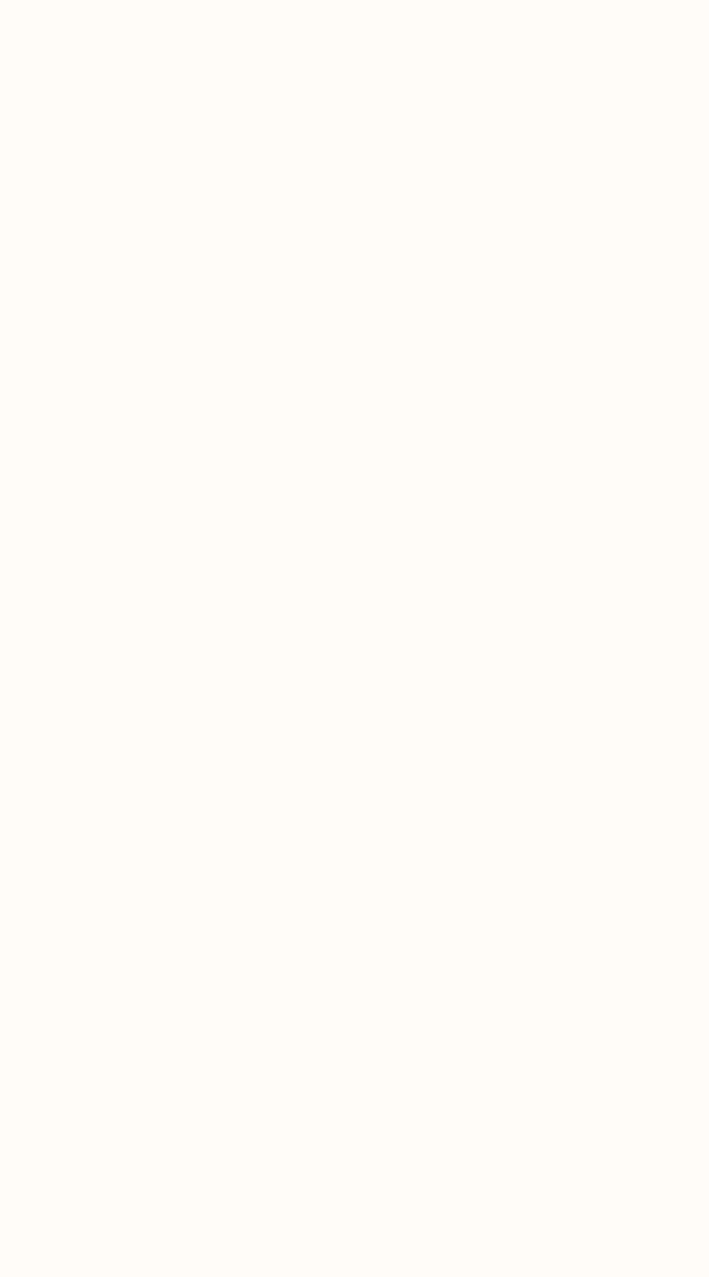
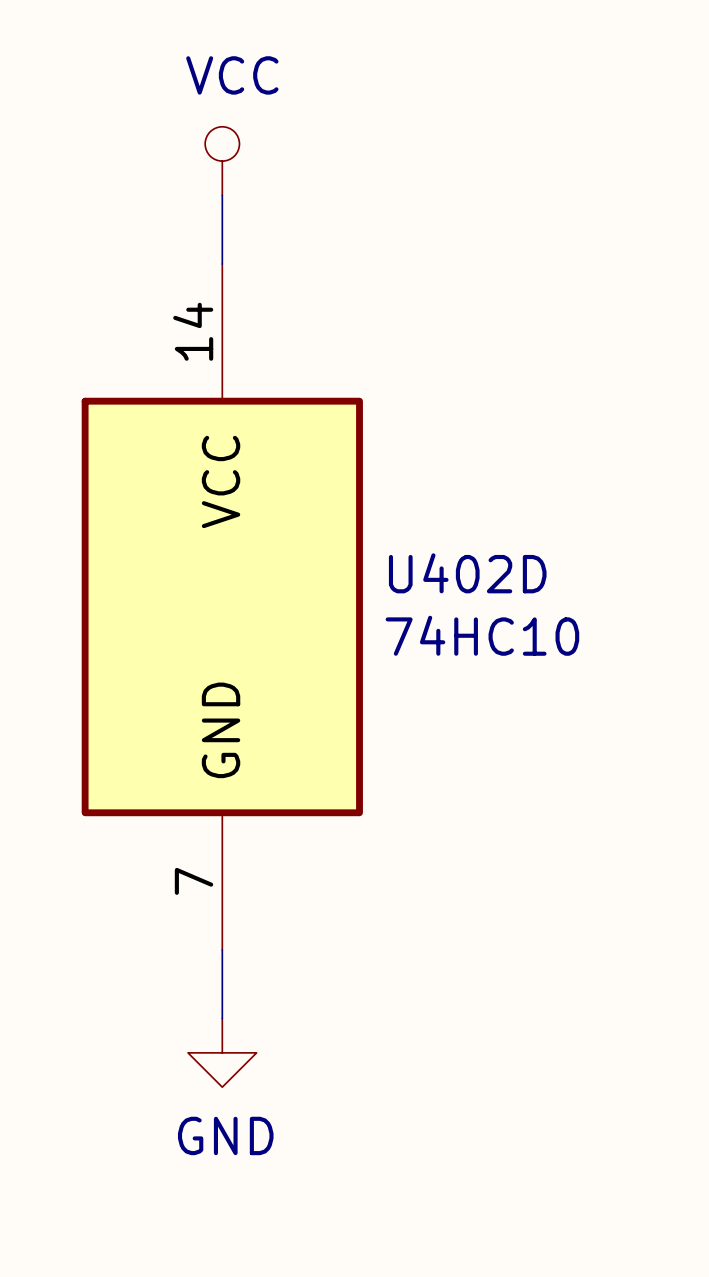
power symbol: none -> VCC (222, 161)
wire: none -> (222, 195) (222, 263)
U402D: none -> 74HC10 (222, 606)
wire: none -> (222, 949) (222, 1018)
power symbol: none -> GND (222, 1052)

